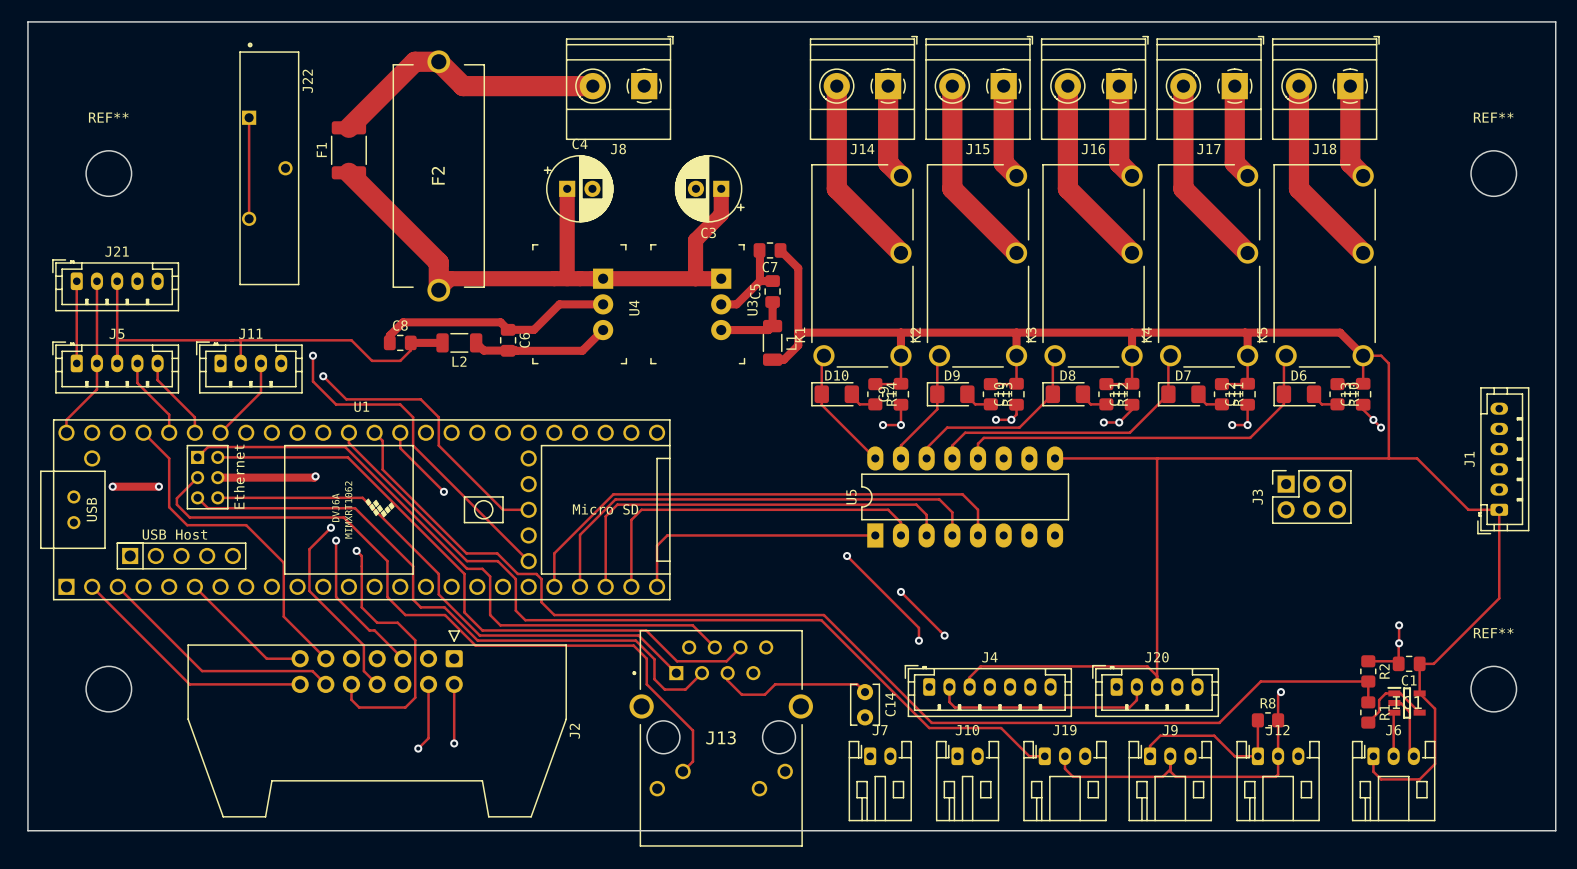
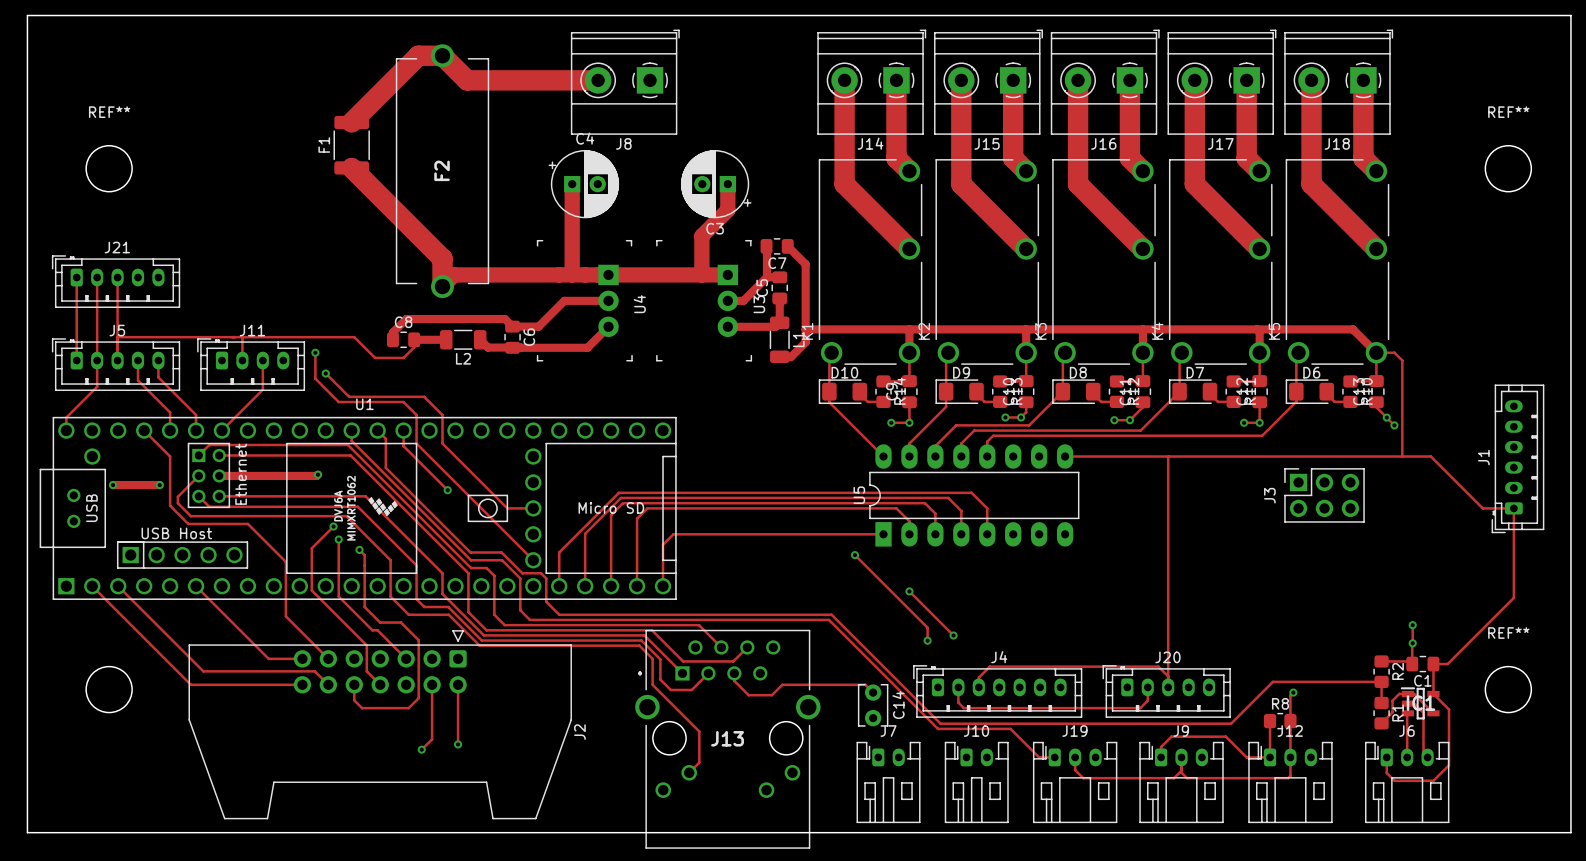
track: (249, 117) (249, 218) -> none
J22: (269, 163) -> none

